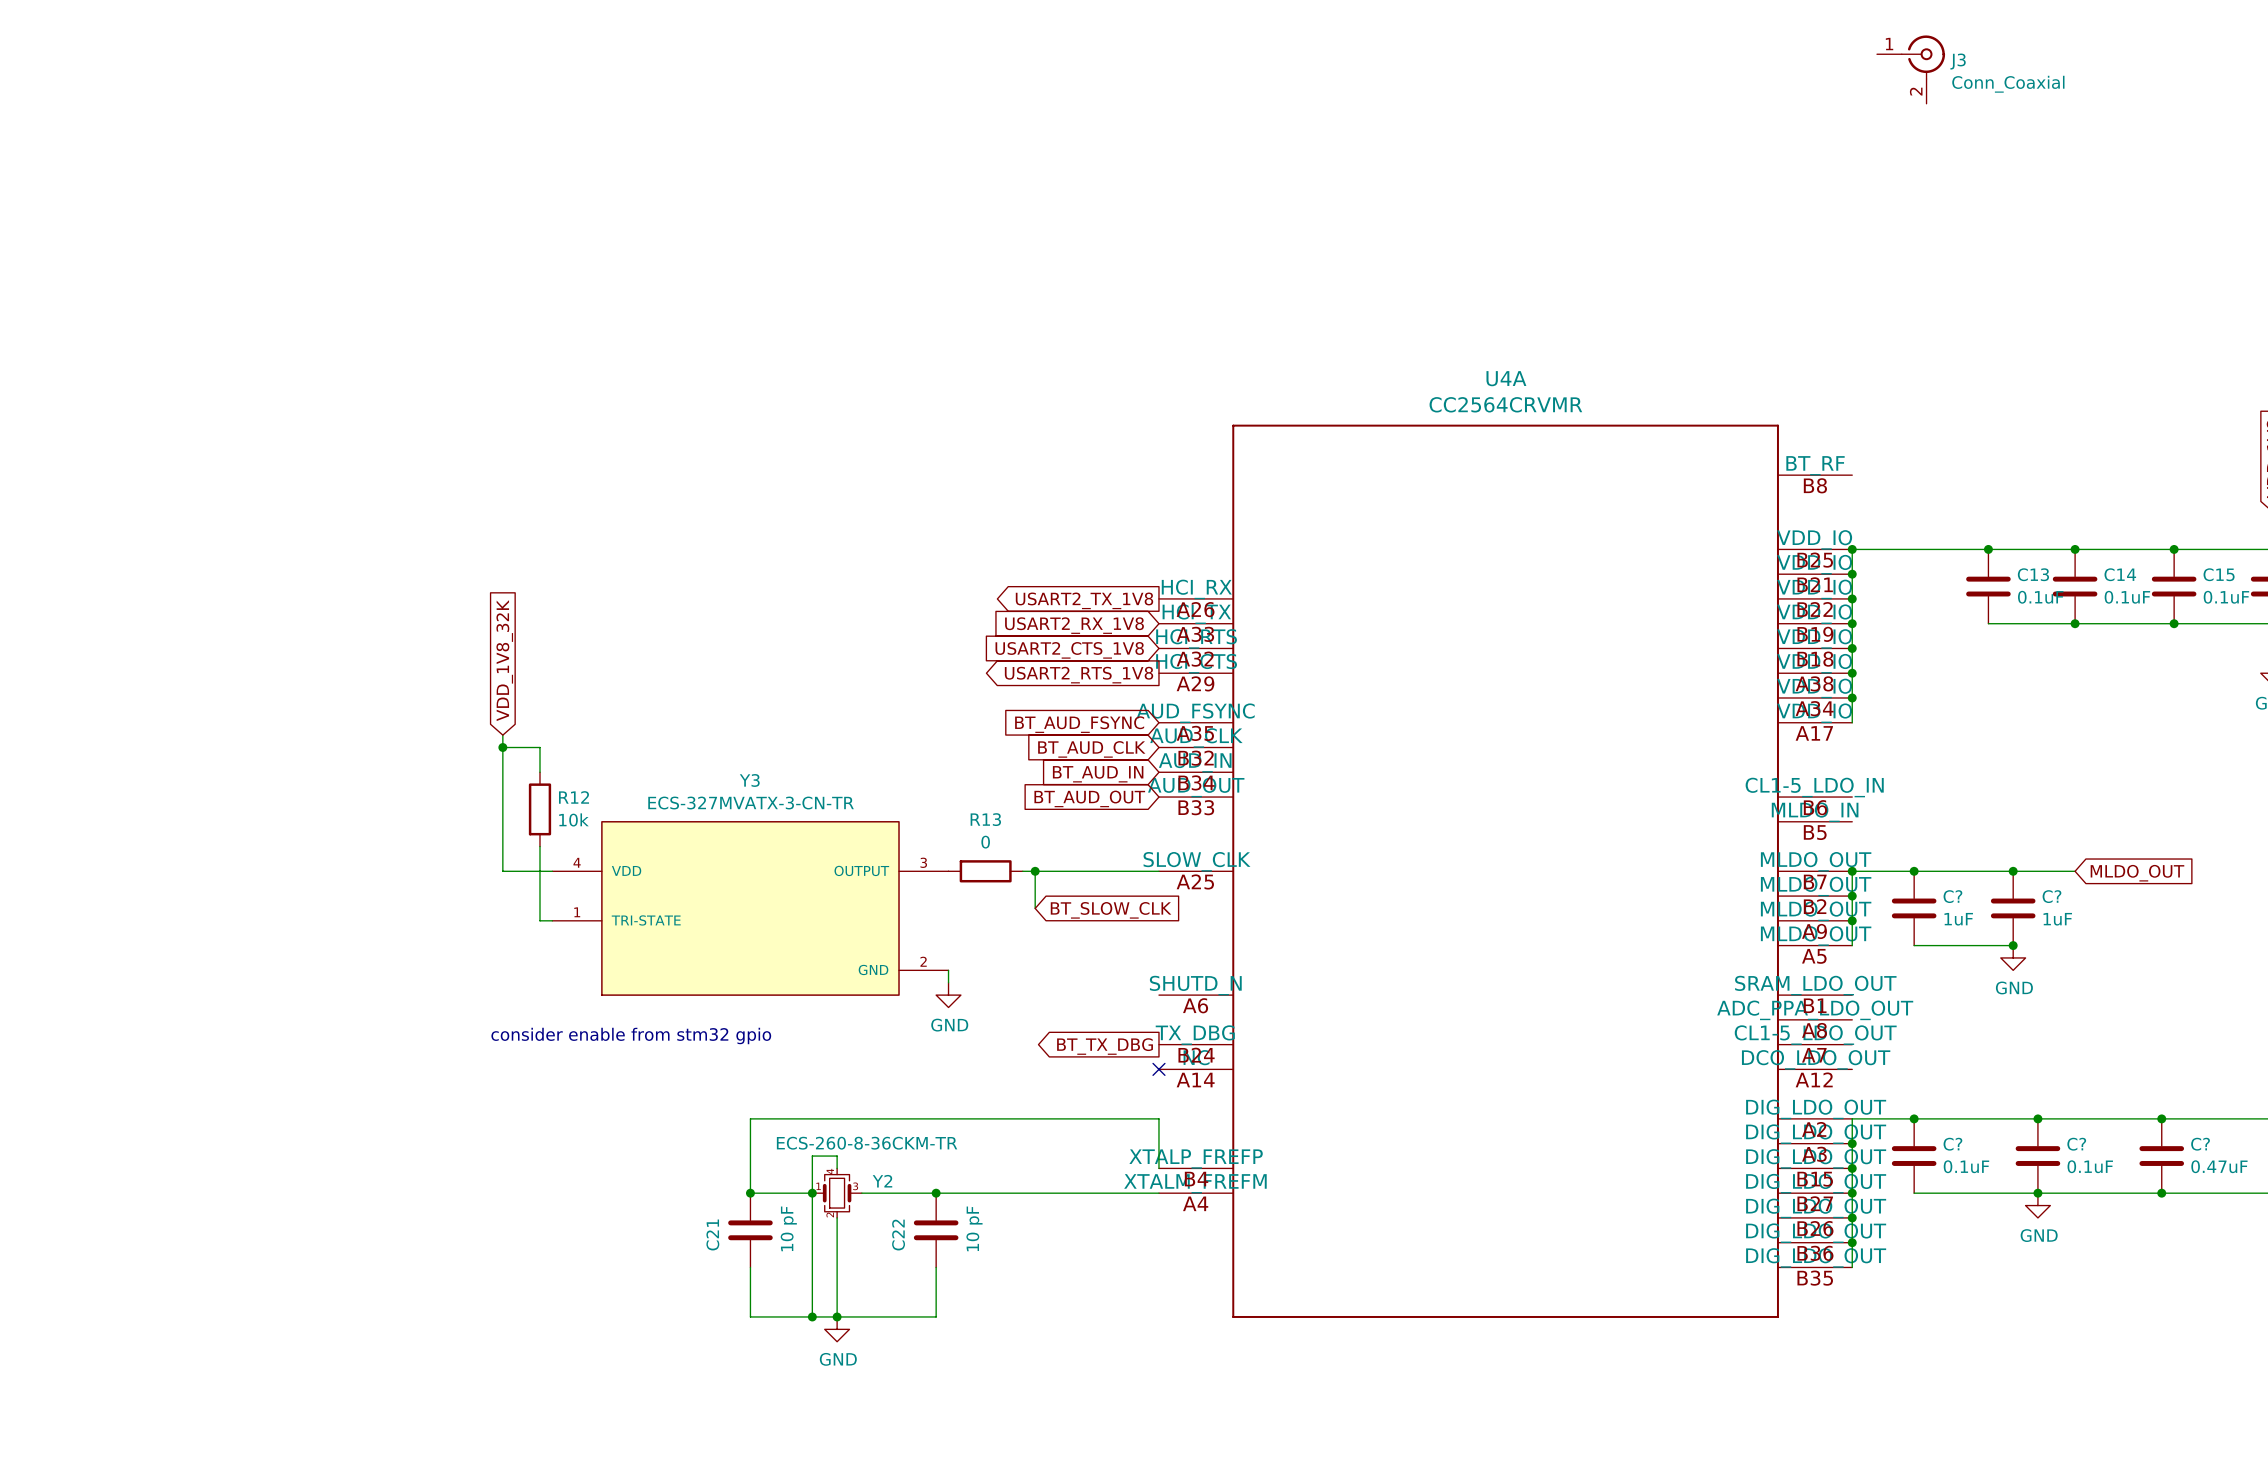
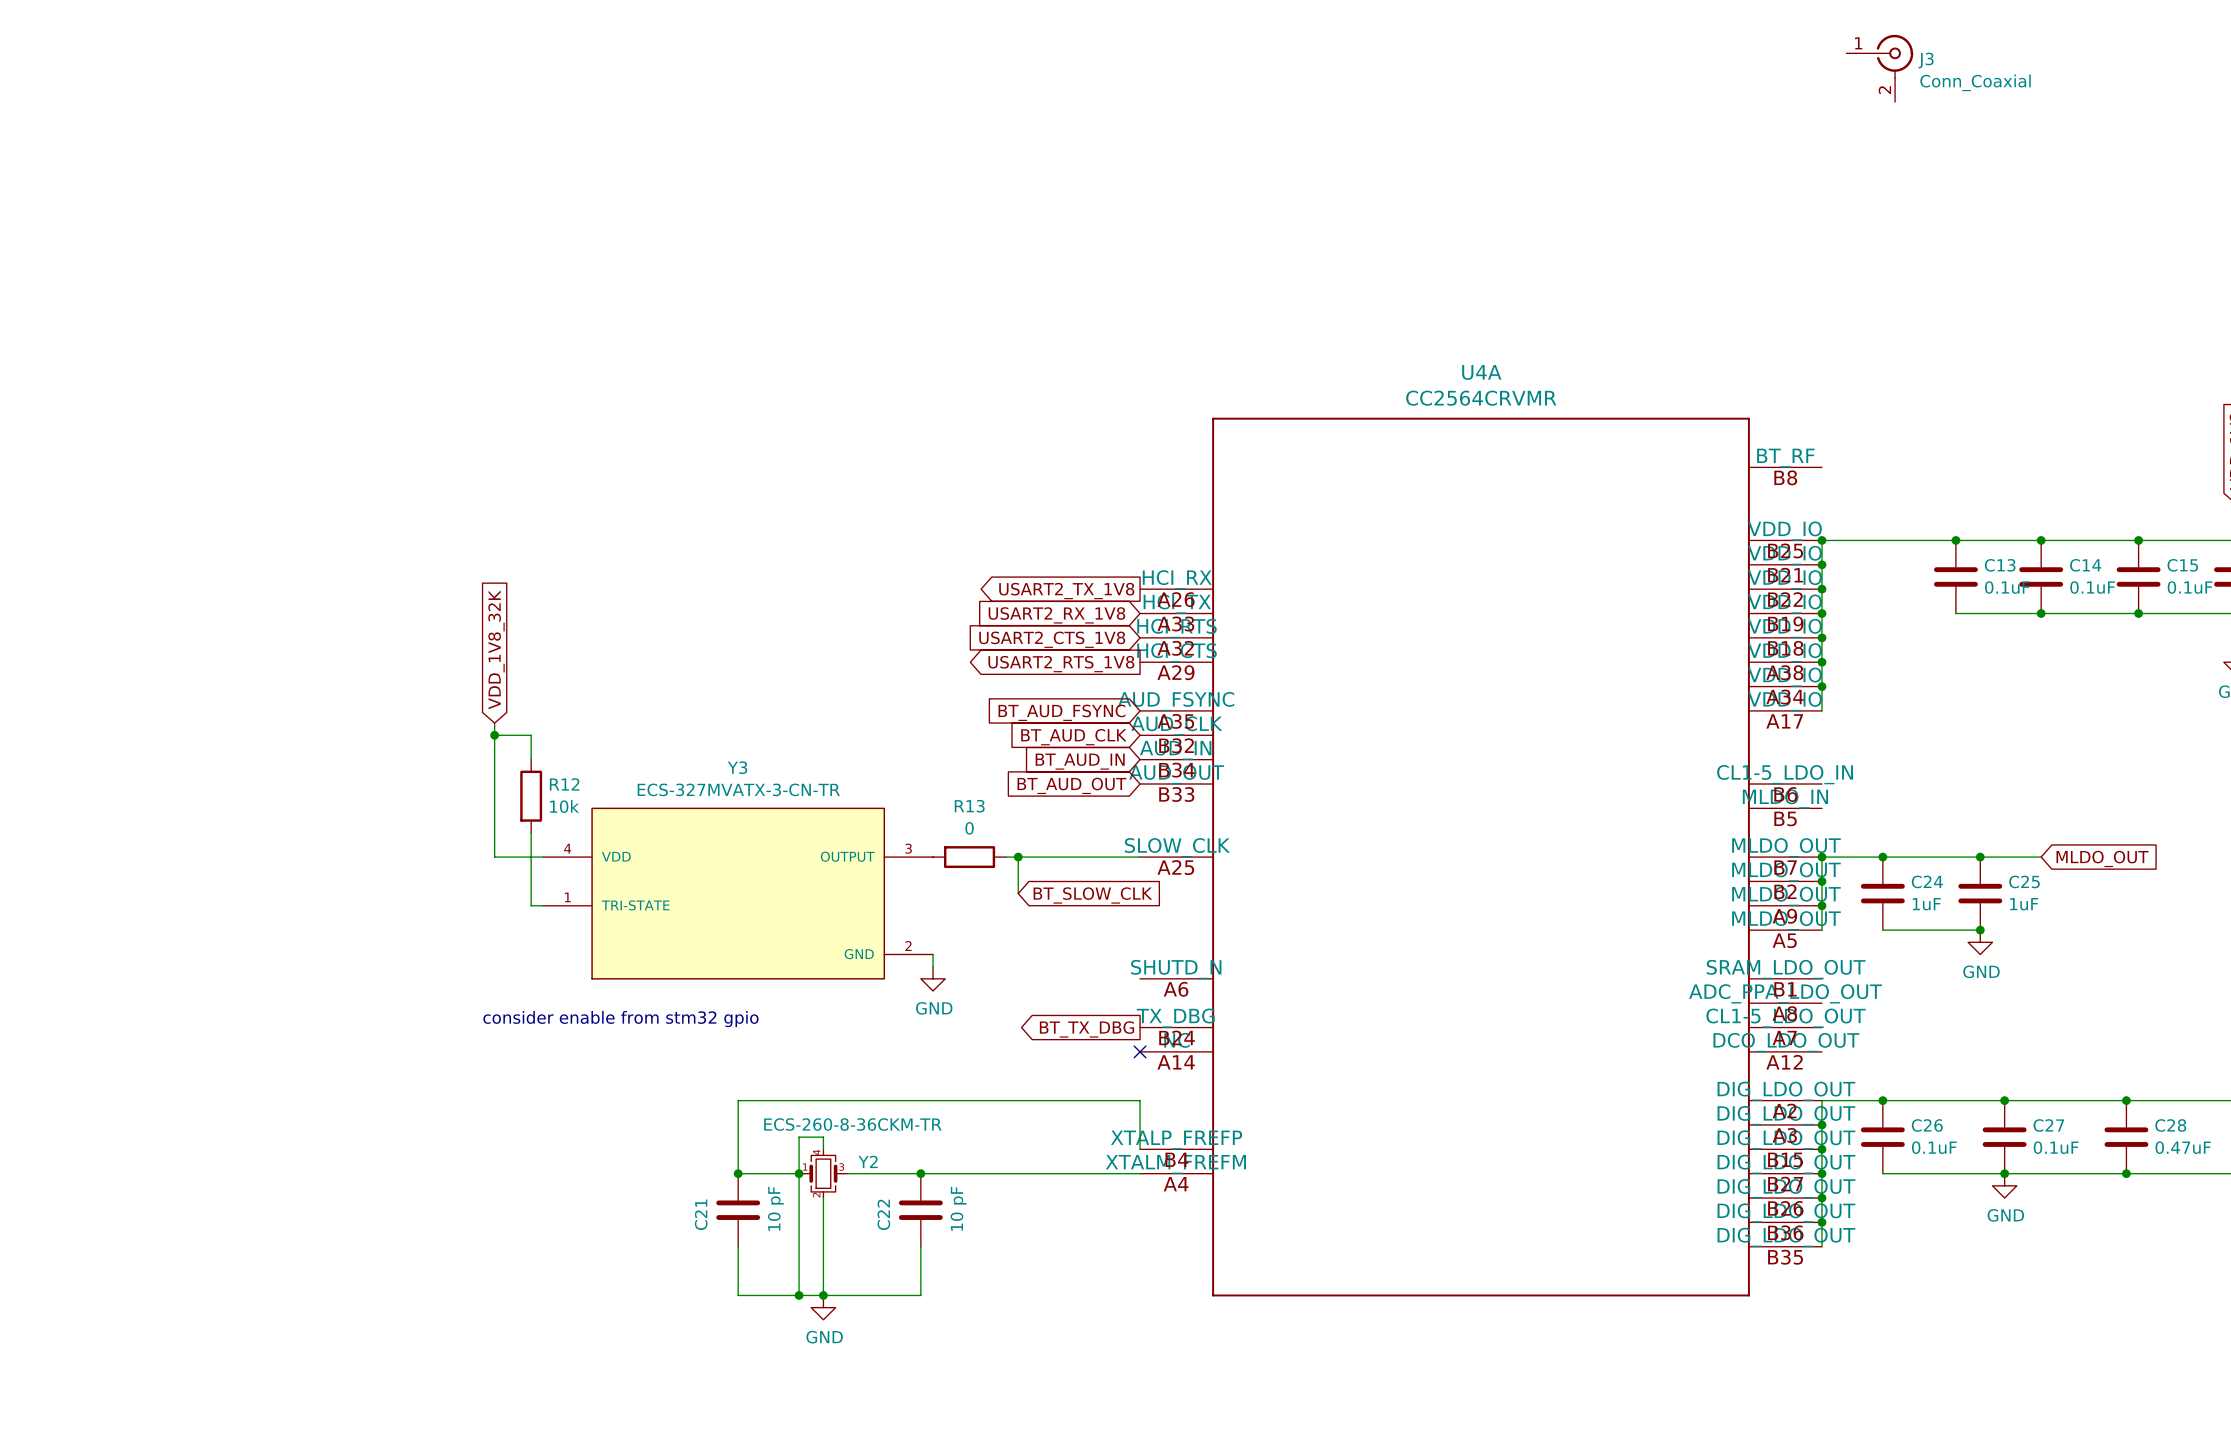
C? name: C? (1952, 896) -> C24 (1927, 881)
C? name: C? (2051, 896) -> C25 (2024, 881)
C? name: C? (1952, 1144) -> C26 (1927, 1125)
C? name: C? (2076, 1144) -> C27 (2048, 1125)
C? name: C? (2200, 1144) -> C28 (2170, 1125)

